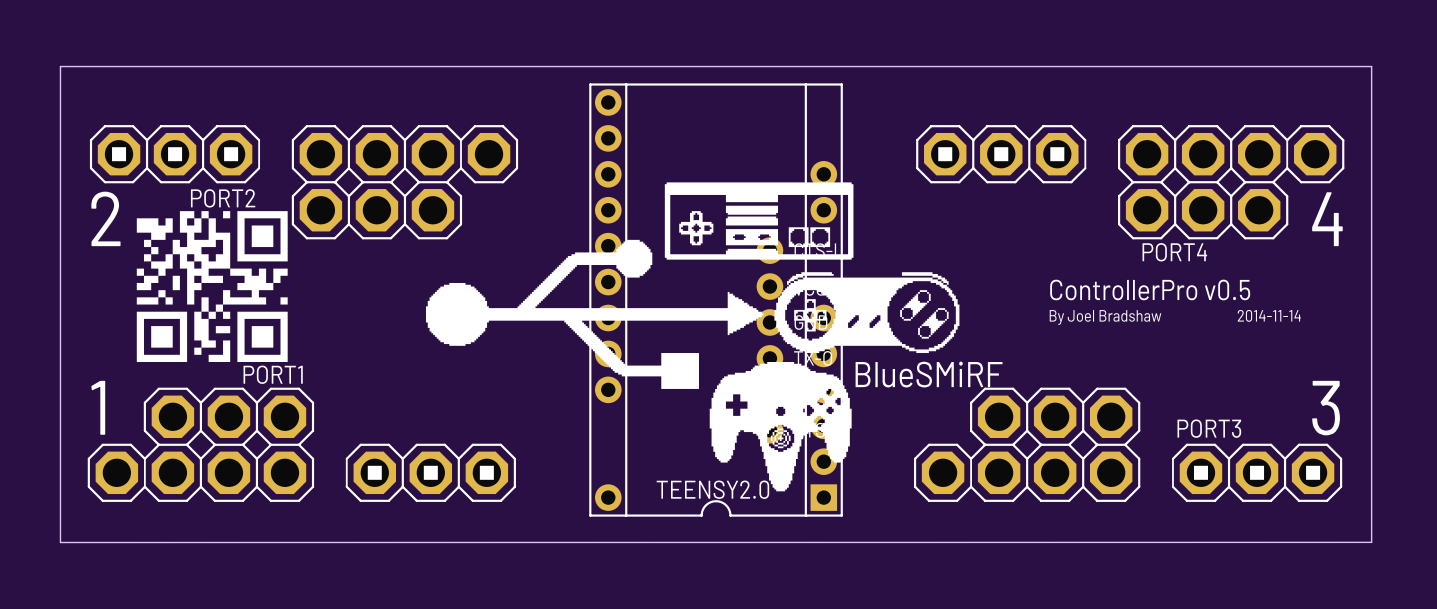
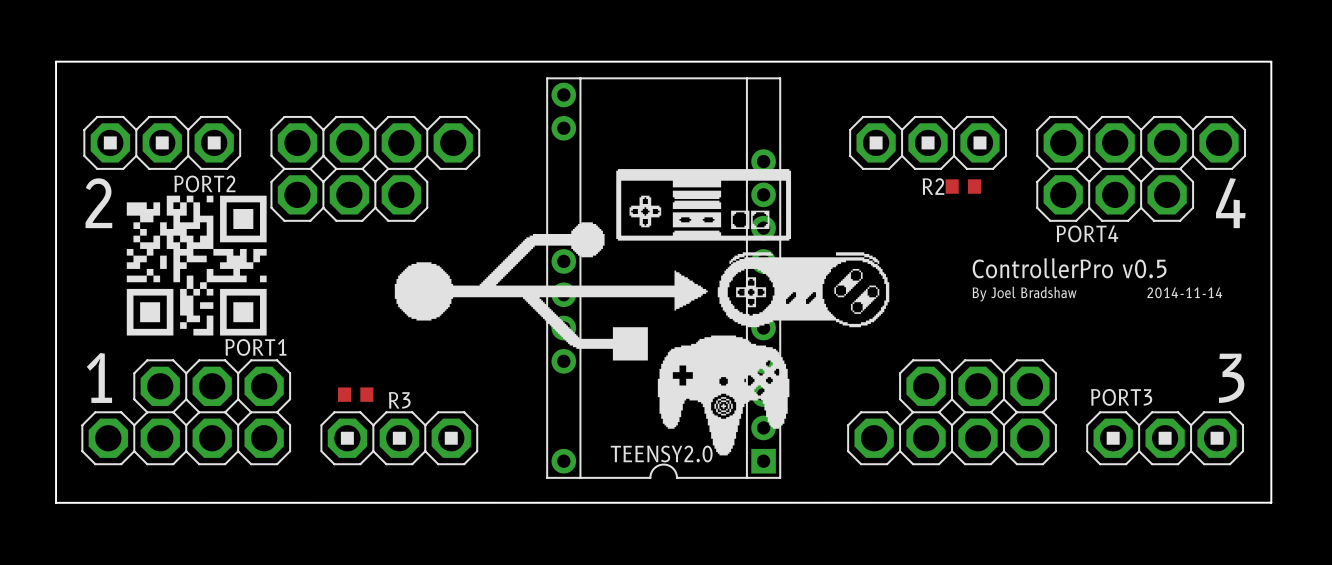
TEENSY2.0 footprint: [589, 83, 843, 517] -> [546, 77, 782, 479]
R2: none -> (963, 186)
part: (769, 340) -> none
R3: none -> (355, 394)

